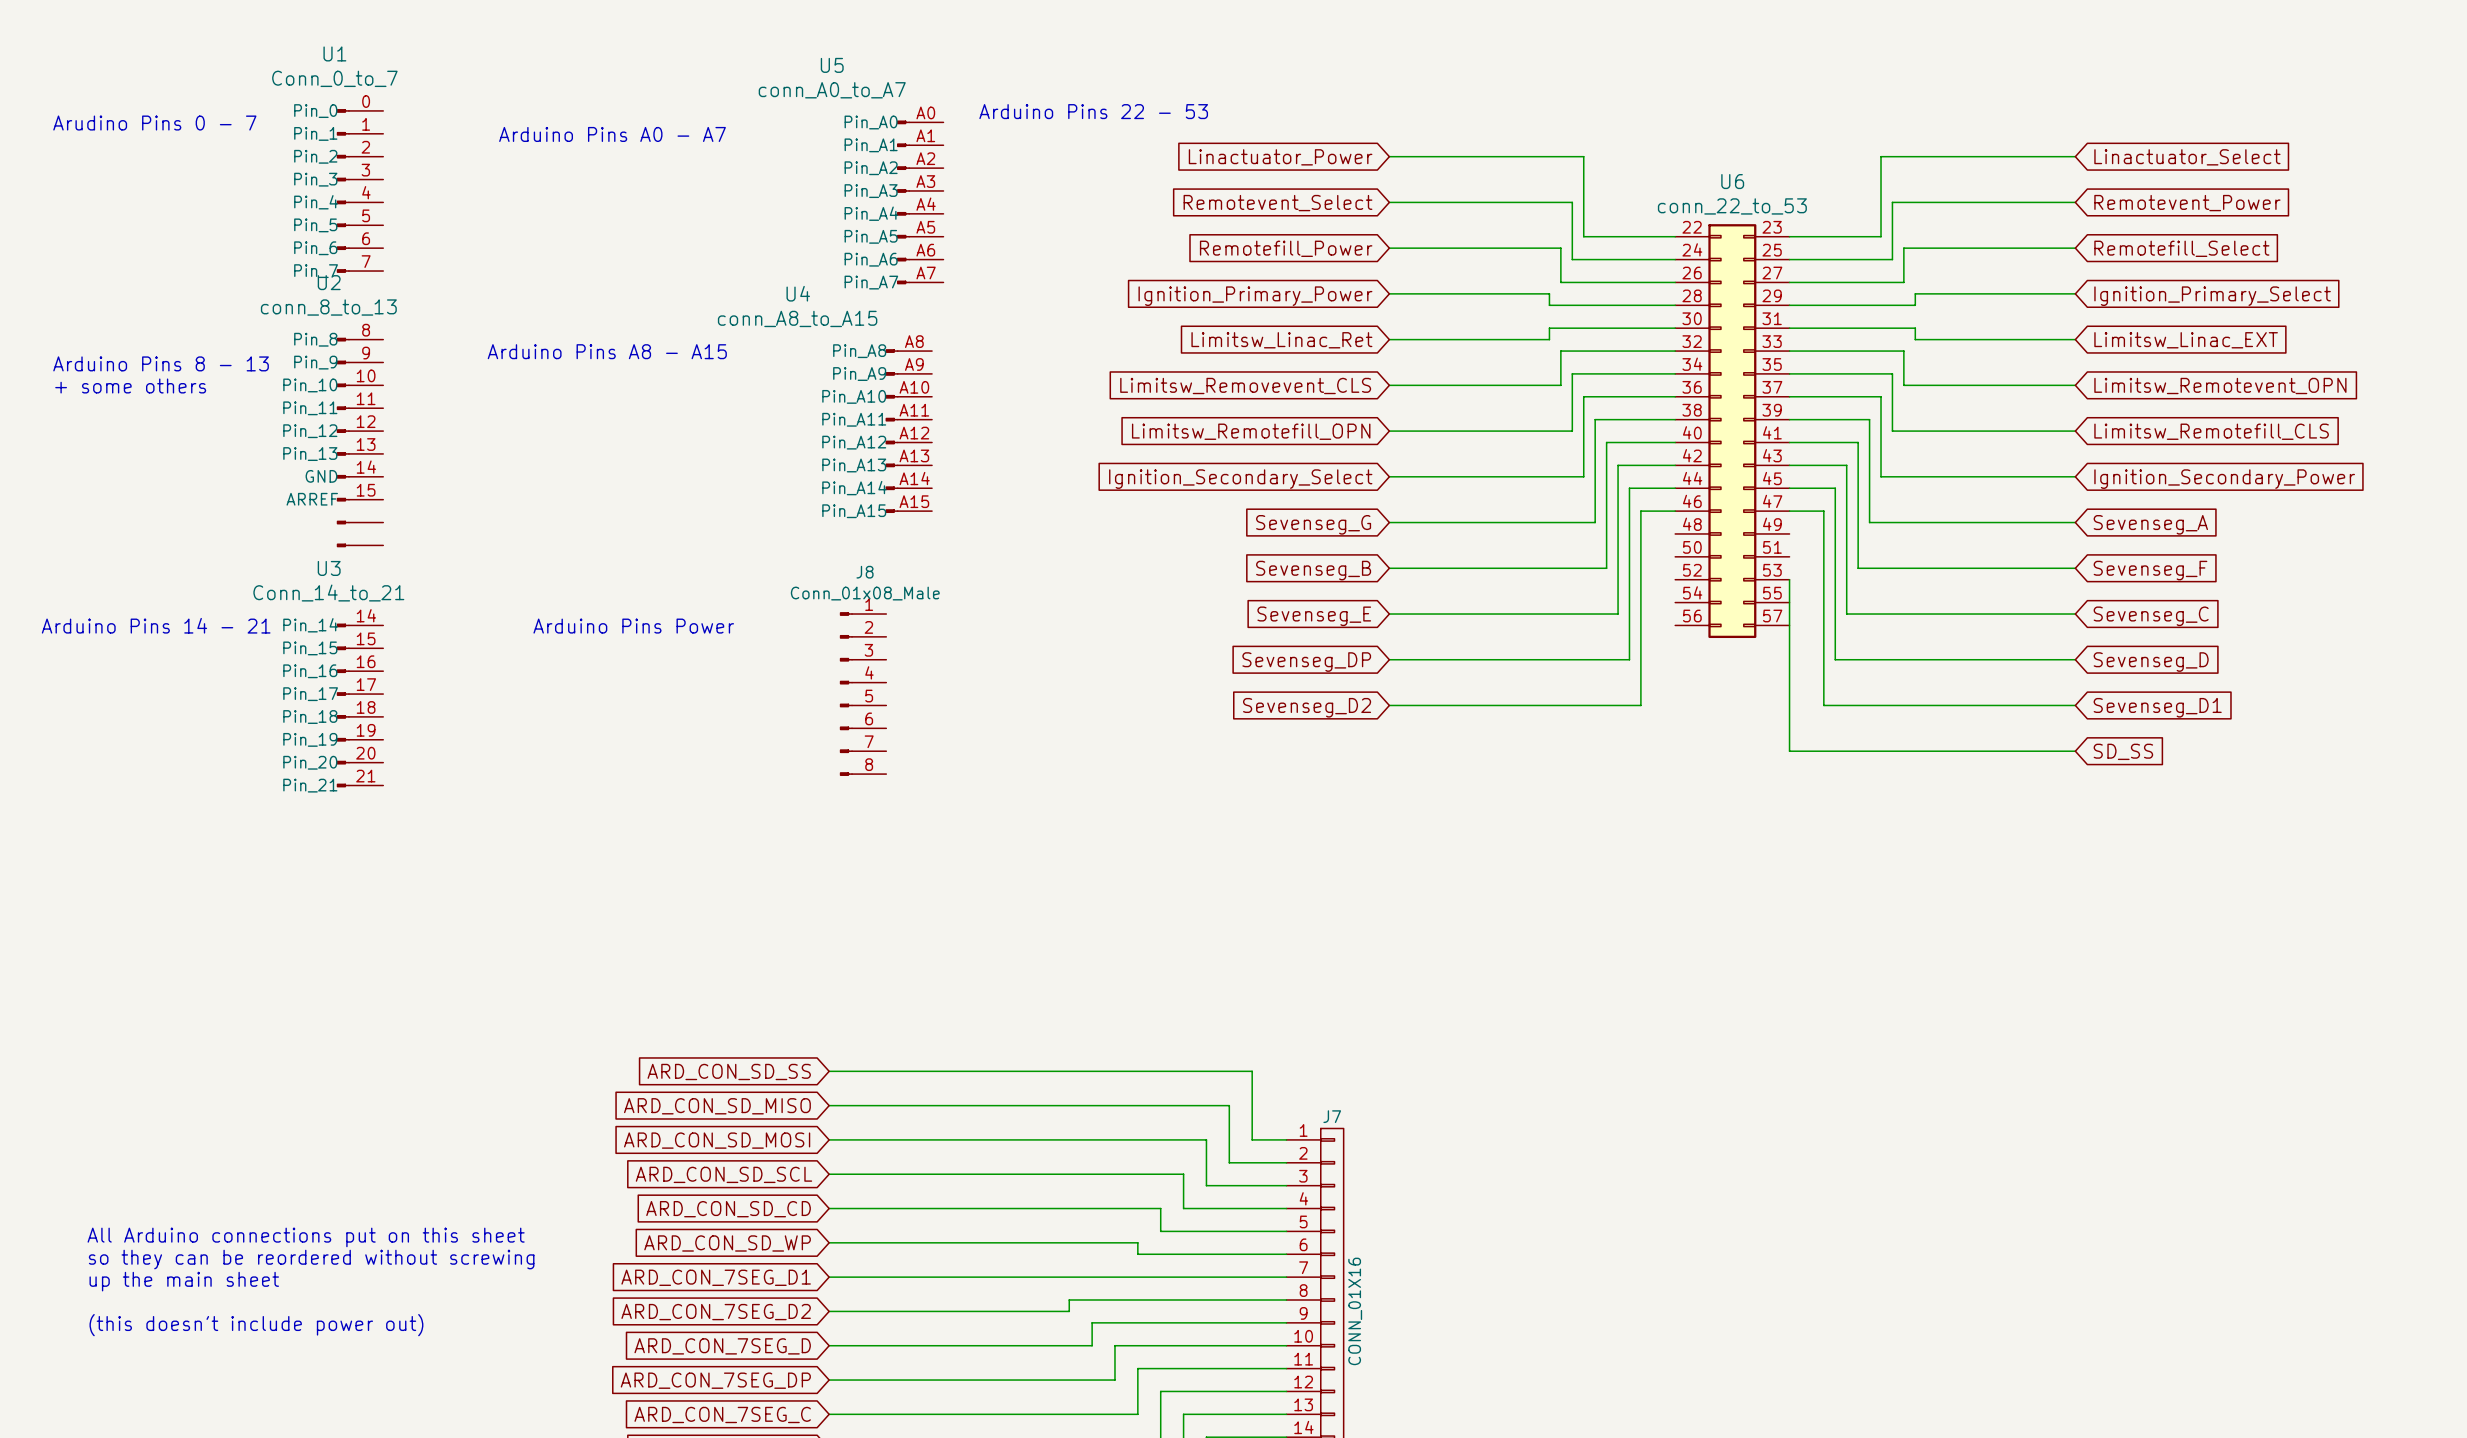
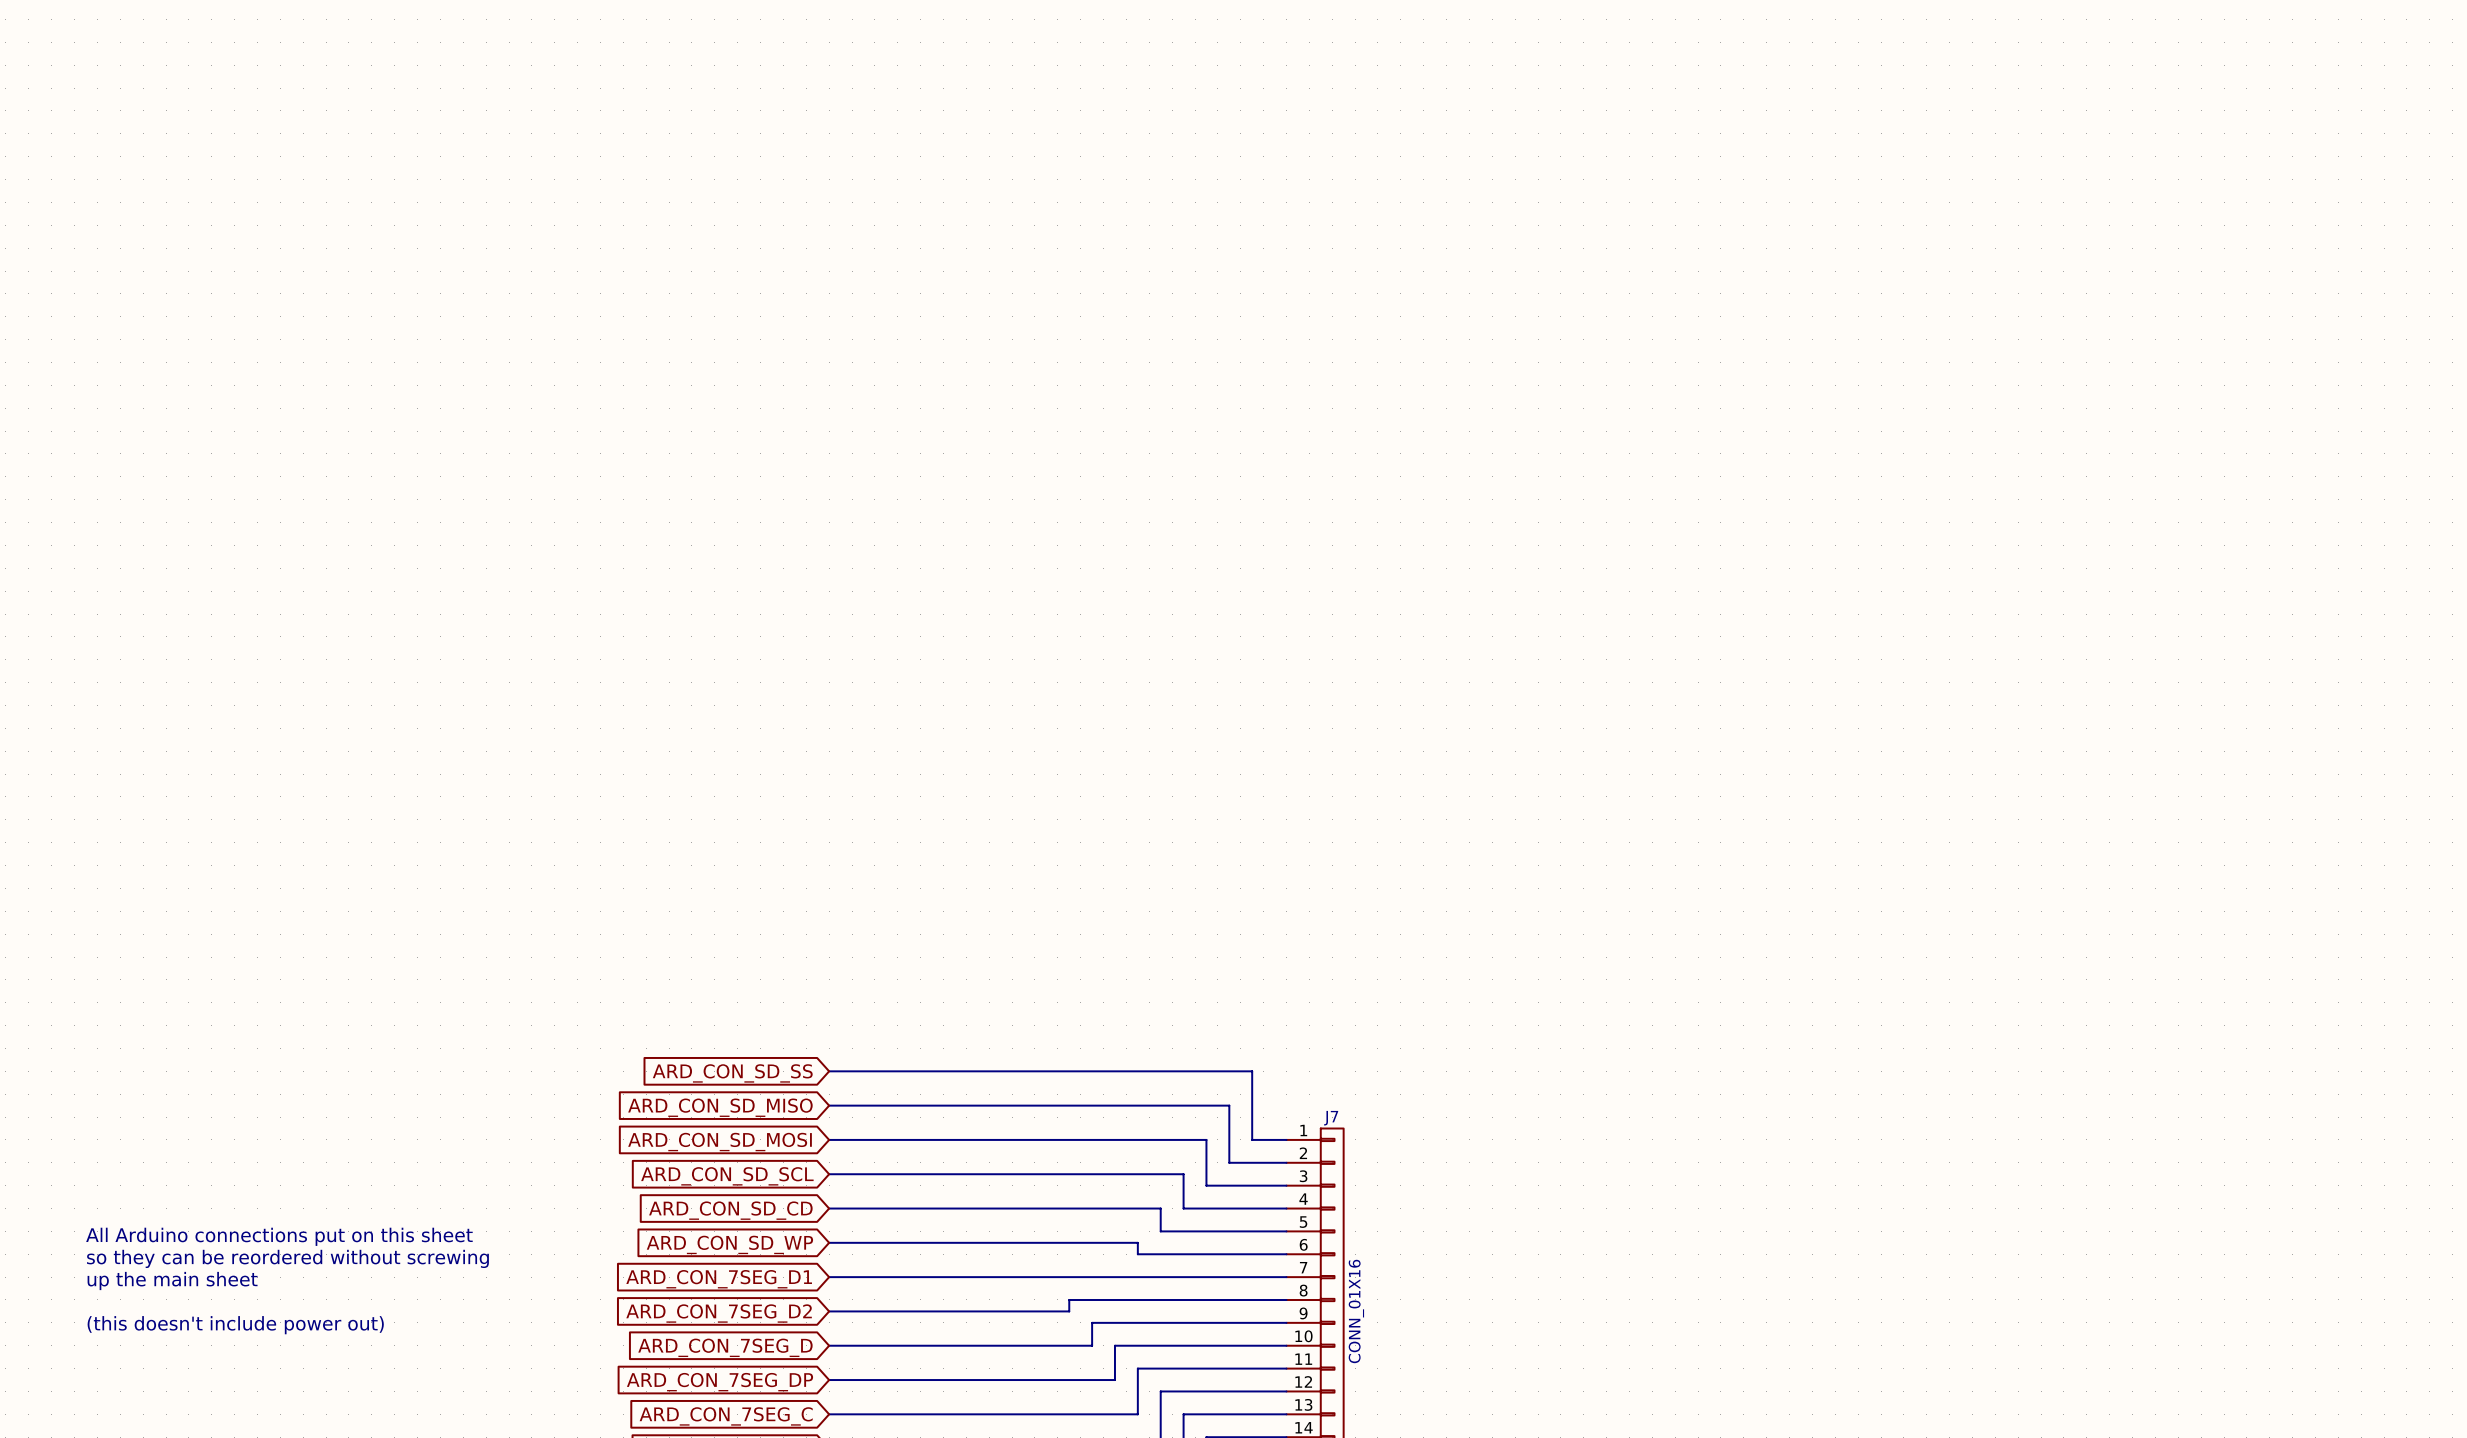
text: Arduino Pins 22 - 53 (1093, 111) -> none
text: Arudino Pins 0 - 7 (154, 123) -> none
text: Arduino Pins A0 - A7 (612, 134) -> none
wire: (1389, 156) (1583, 156) (1583, 236) (1675, 236) -> none
wire: (2075, 156) (1881, 156) (1881, 236) (1789, 236) -> none
global label: Linactuator_Power (1280, 157) -> none
global label: Linactuator_Select (2187, 157) -> none
U1: Conn_0_to_7 (360, 190) -> none
U5: conn_A0_to_A7 (920, 202) -> none
wire: (1389, 202) (1572, 202) (1572, 259) (1675, 259) -> none
wire: (2075, 202) (1892, 202) (1892, 259) (1789, 259) -> none
global label: Remotevent_Select (1277, 203) -> none
global label: Remotevent_Power (2187, 203) -> none
global label: Remotefill_Power (1286, 248) -> none
wire: (1389, 248) (1560, 248) (1560, 282) (1675, 282) -> none
wire: (2075, 248) (1903, 248) (1903, 282) (1789, 282) -> none
global label: Remotefill_Select (2181, 248) -> none
wire: (1389, 293) (1549, 293) (1549, 305) (1675, 305) -> none
wire: (2075, 293) (1915, 293) (1915, 305) (1789, 305) -> none
global label: Ignition_Primary_Power (1255, 296) -> none
global label: Ignition_Primary_Select (2212, 296) -> none
wire: (1675, 328) (1549, 328) (1549, 339) (1389, 339) -> none
wire: (1789, 328) (1915, 328) (1915, 339) (2075, 339) -> none
global label: Limitsw_Linac_Ret (1281, 340) -> none
global label: Limitsw_Linac_EXT (2186, 340) -> none
text: Arduino Pins A8 - A15 (607, 351) -> none
wire: (1675, 351) (1560, 351) (1560, 385) (1389, 385) -> none
wire: (1789, 351) (1903, 351) (1903, 385) (2075, 385) -> none
text: Arduino Pins 8 - 13 (161, 363) -> none
wire: (1675, 373) (1572, 373) (1572, 431) (1389, 431) -> none
wire: (1789, 373) (1892, 373) (1892, 431) (2075, 431) -> none
text: + some others (130, 385) -> none
global label: Limitsw_Removevent_CLS (1245, 386) -> none
global label: Limitsw_Remotevent_OPN (2220, 386) -> none
wire: (1675, 396) (1583, 396) (1583, 476) (1389, 476) -> none
wire: (1789, 396) (1881, 396) (1881, 476) (2075, 476) -> none
wire: (1675, 419) (1595, 419) (1595, 522) (1389, 522) -> none
wire: (1789, 419) (1869, 419) (1869, 522) (2075, 522) -> none
U4: conn_A8_to_A15 (908, 431) -> none
global label: Limitsw_Remotefill_OPN (1251, 431) -> none
U6: conn_22_to_53 (1732, 431) -> none
global label: Limitsw_Remotefill_CLS (2211, 431) -> none
U2: conn_8_to_13 (360, 442) -> none
wire: (1675, 442) (1606, 442) (1606, 568) (1389, 568) -> none
wire: (1789, 442) (1858, 442) (1858, 568) (2075, 568) -> none
wire: (1675, 465) (1618, 465) (1618, 614) (1389, 614) -> none
wire: (1789, 465) (1846, 465) (1846, 614) (2075, 614) -> none
global label: Ignition_Secondary_Select (1240, 479) -> none
global label: Ignition_Secondary_Power (2224, 479) -> none
wire: (1675, 488) (1629, 488) (1629, 659) (1389, 659) -> none
wire: (1789, 488) (1835, 488) (1835, 659) (2075, 659) -> none
wire: (1675, 511) (1640, 511) (1640, 705) (1389, 705) -> none
wire: (1789, 511) (1823, 511) (1823, 705) (2075, 705) -> none
global label: Sevenseg_G (1313, 524) -> none
global label: Sevenseg_A (2150, 524) -> none
global label: Sevenseg_B (1313, 570) -> none
global label: Sevenseg_F (2150, 570) -> none
wire: (1789, 579) (1789, 751) (2075, 751) -> none
global label: Sevenseg_E (1314, 616) -> none
global label: Sevenseg_C (2151, 616) -> none
text: Arduino Pins 14 - 21 (156, 625) -> none
text: Arduino Pins Power (633, 626) -> none
global label: Sevenseg_DP (1306, 662) -> none
global label: Sevenseg_D (2151, 662) -> none
J8: Conn_01x08_Male (863, 694) -> none
U3: Conn_14_to_21 (360, 705) -> none
global label: Sevenseg_D2 (1307, 707) -> none
global label: Sevenseg_D1 (2157, 707) -> none
global label: SD_SS (2123, 751) -> none

